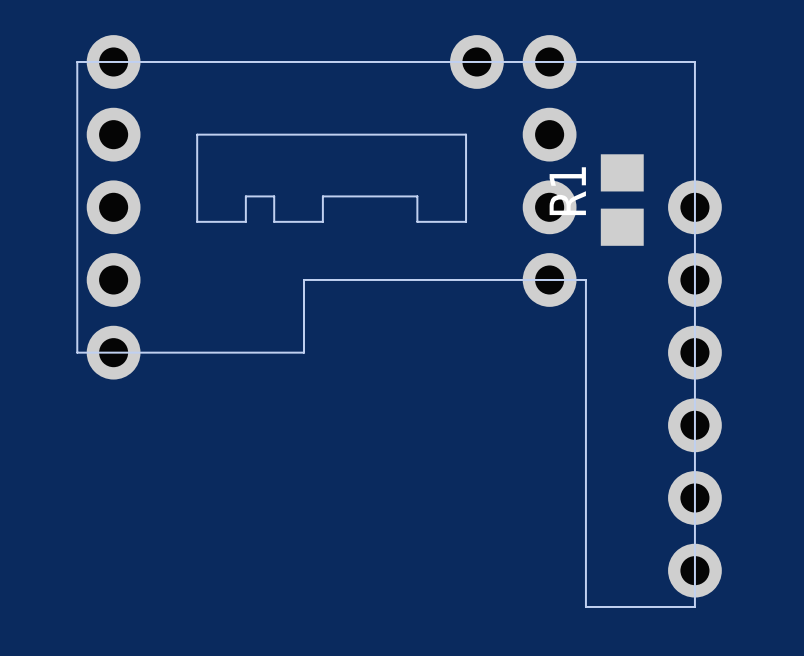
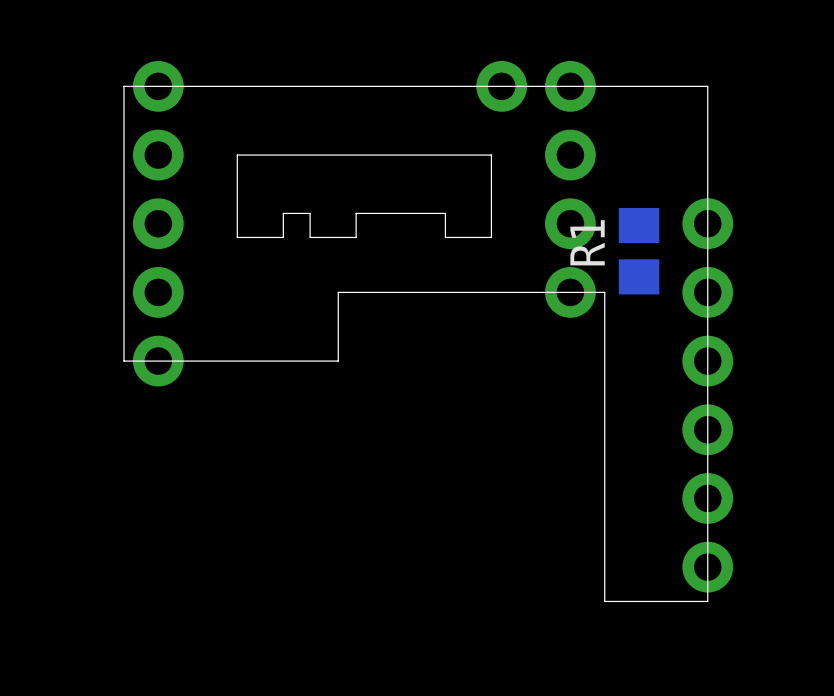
R1 position: (622, 200) -> (639, 251)

